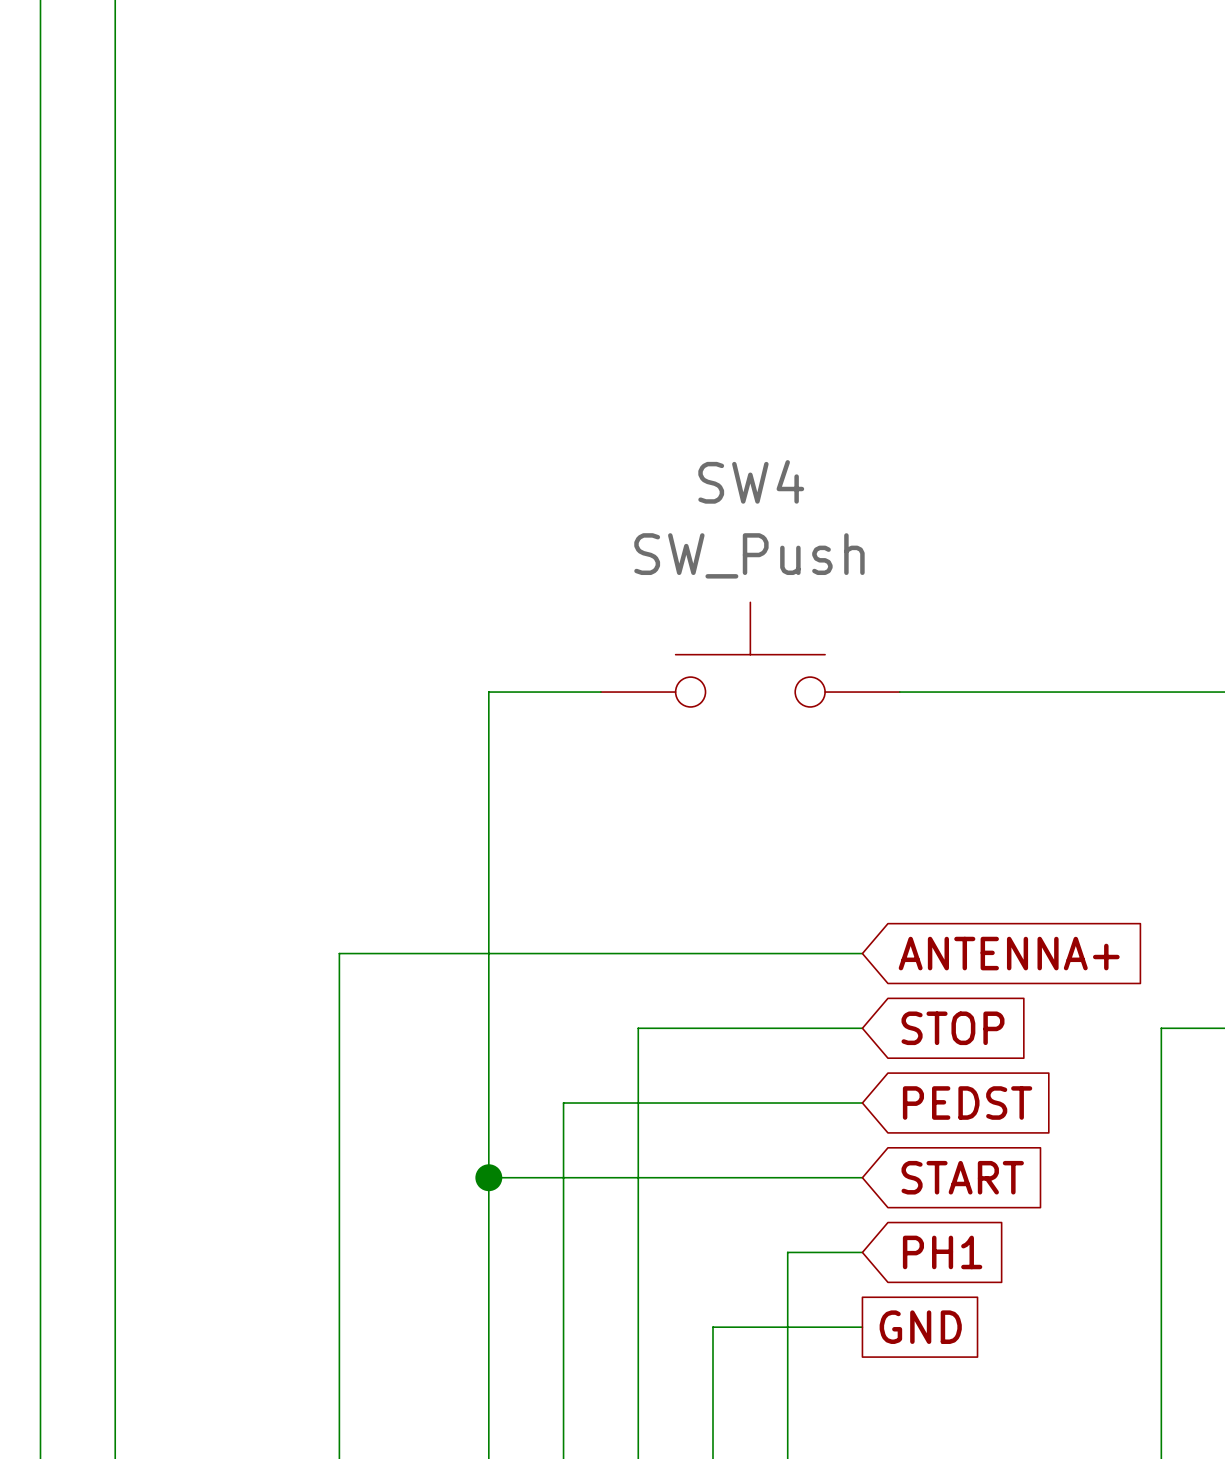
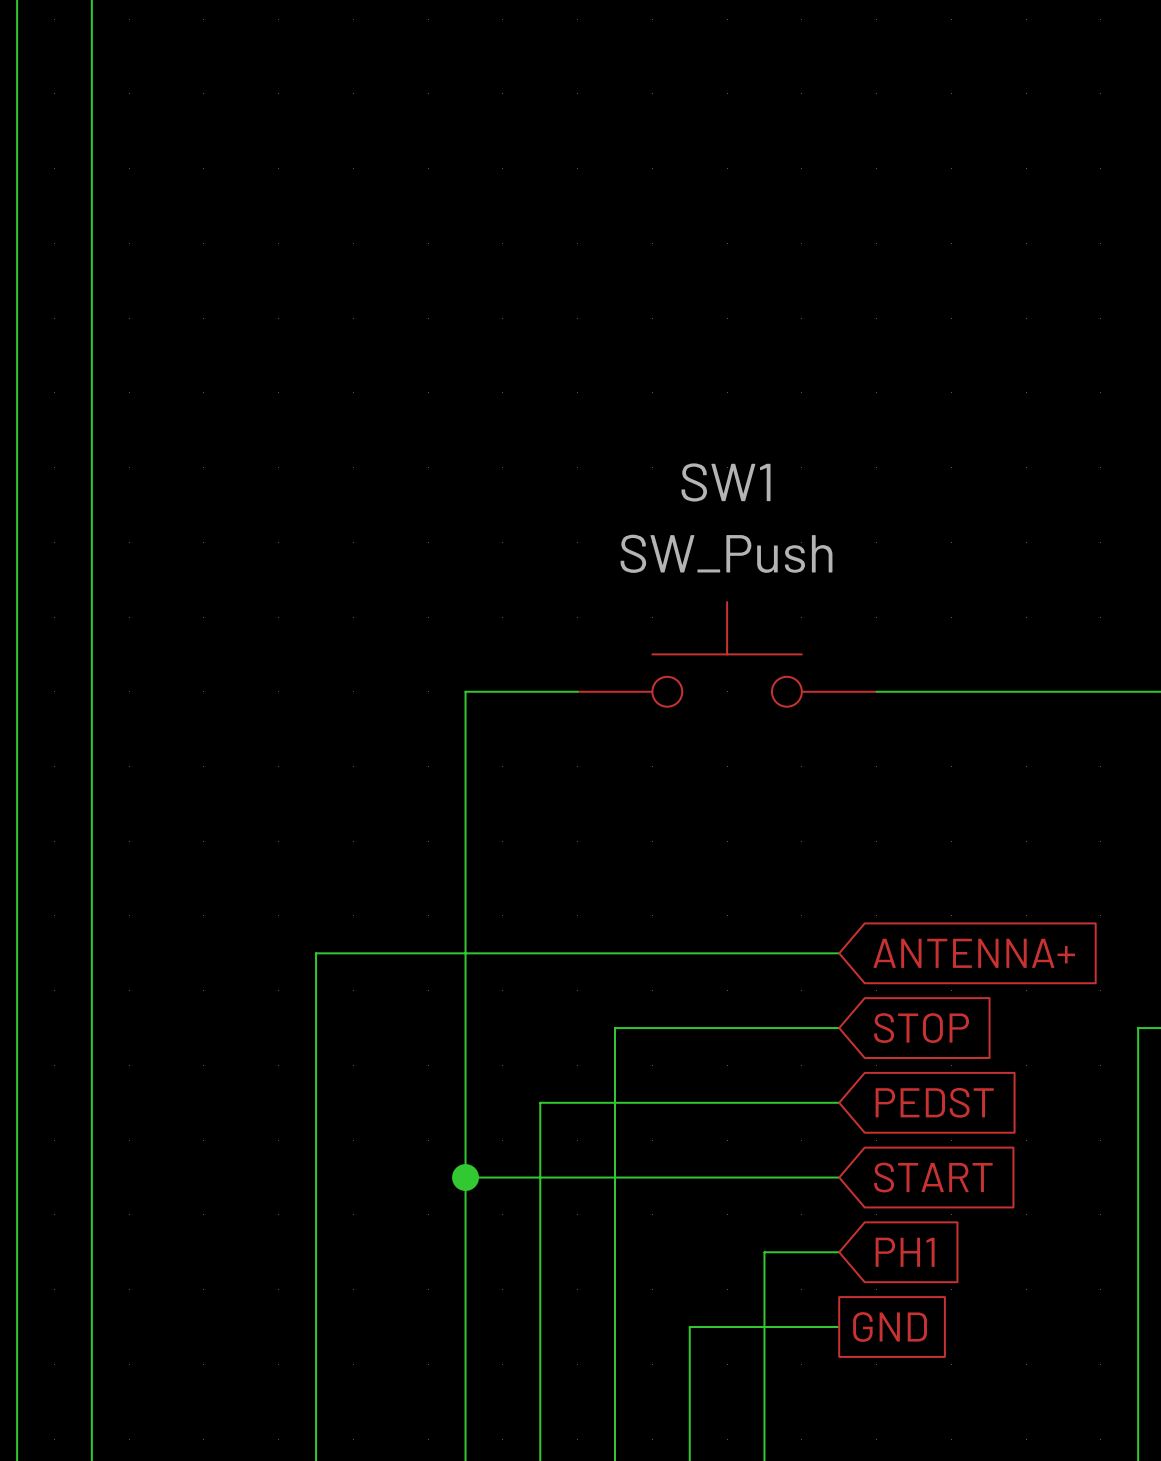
SW4 name: SW4 (751, 481) -> SW1 (726, 482)

